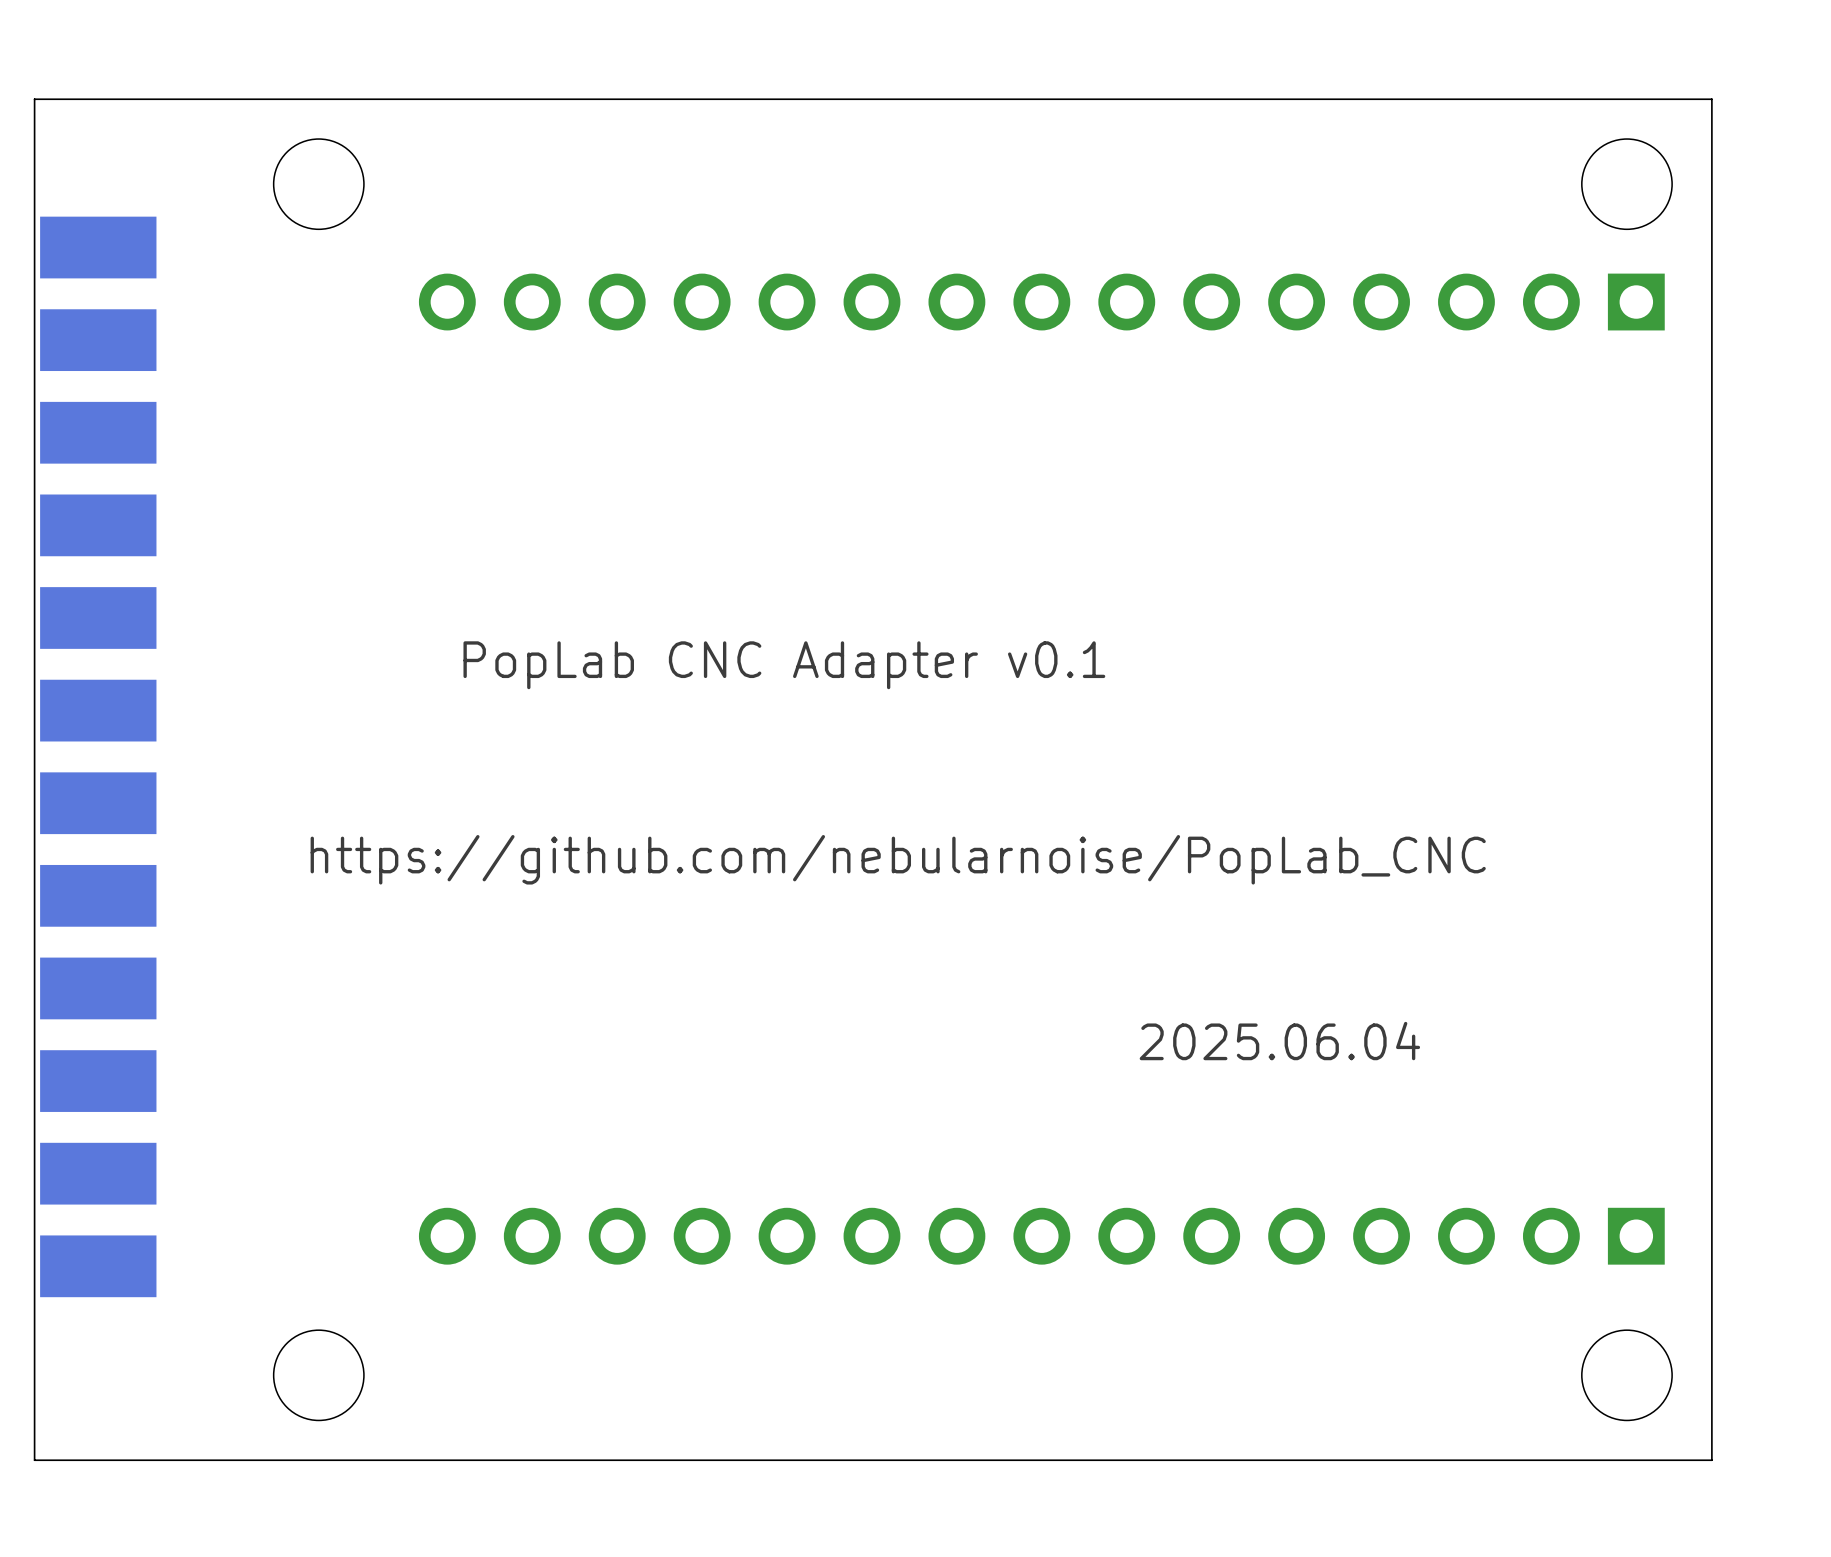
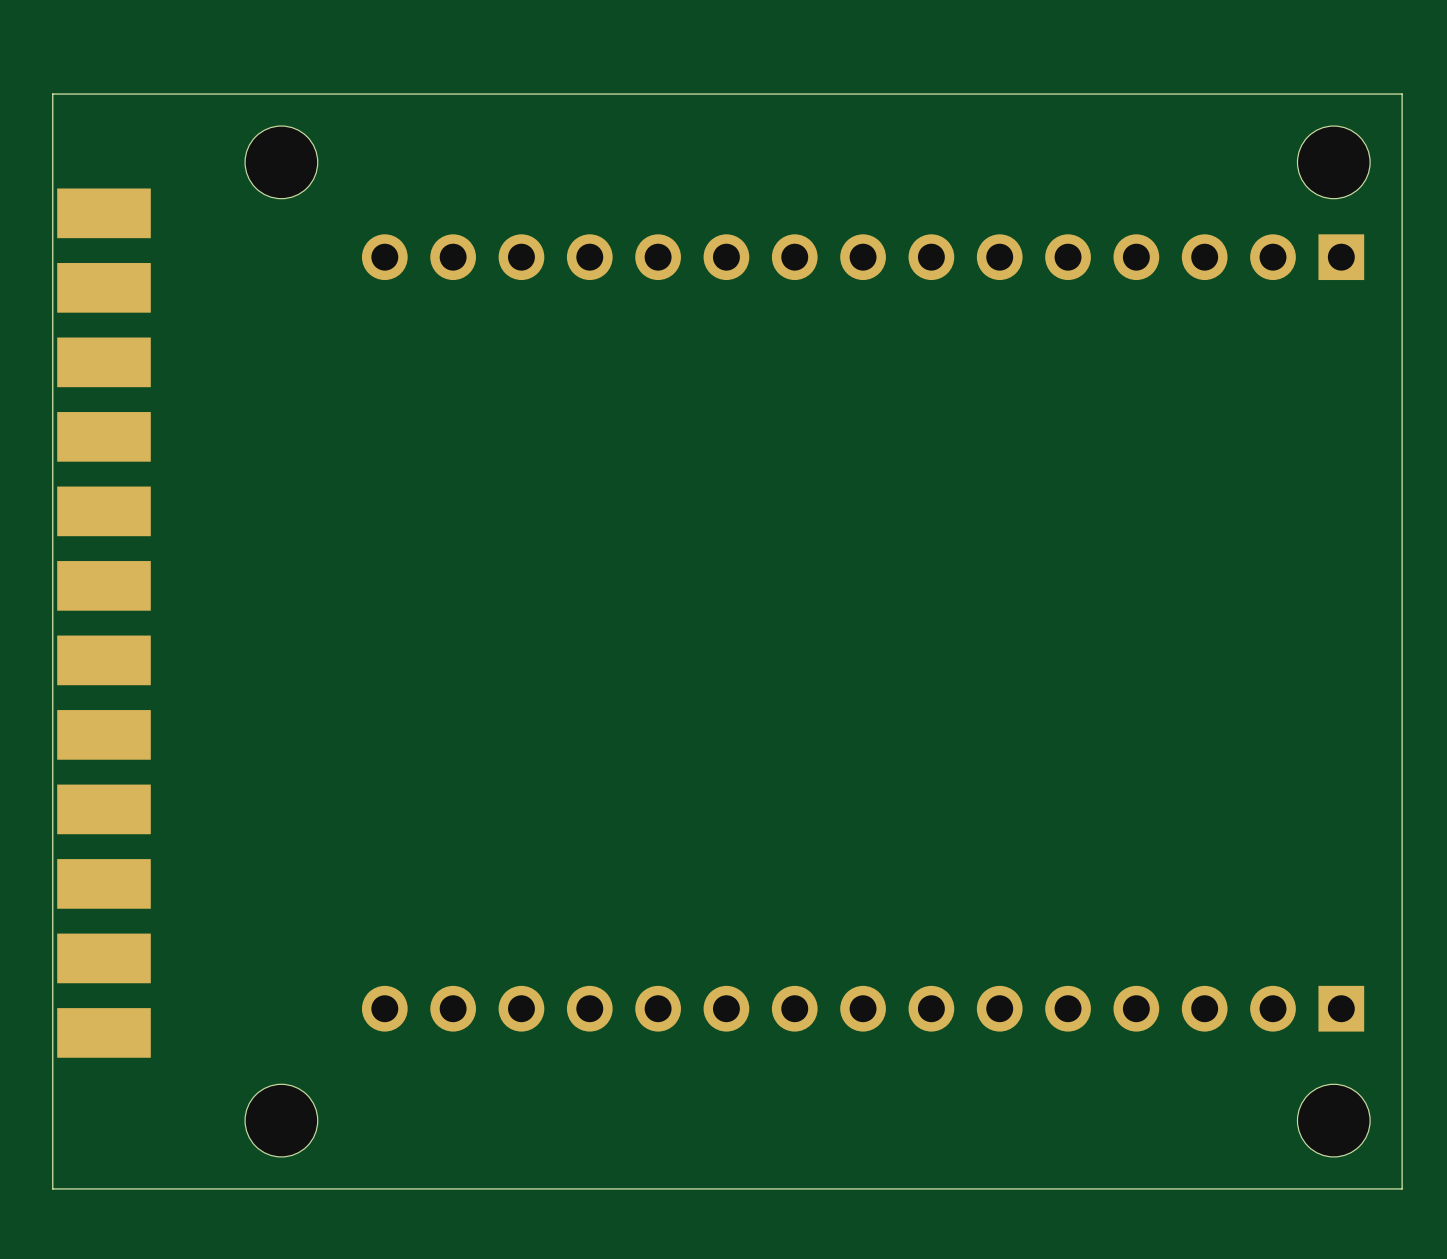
text: PopLab CNC Adapter v0.1 (784, 665) -> none
text: https://github.com/nebularnoise/PopLab_CNC (898, 859) -> none
text: 2025.06.04 (1279, 1041) -> none

